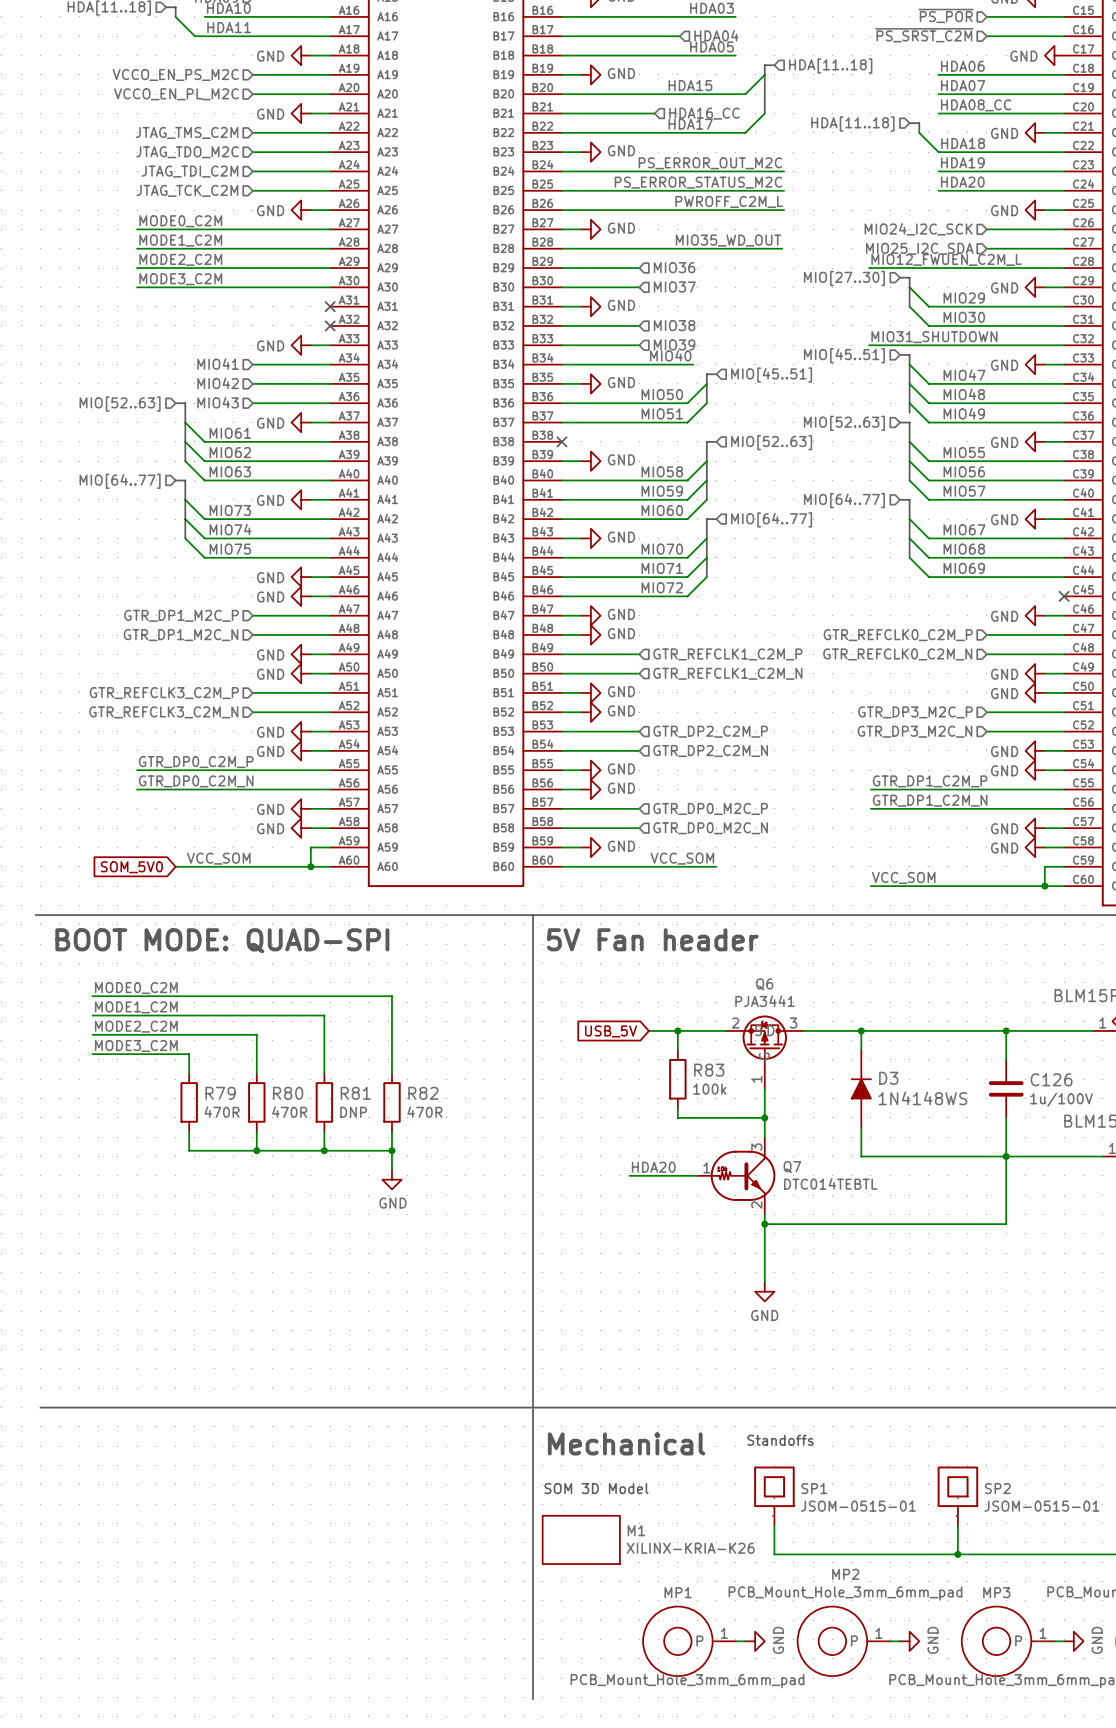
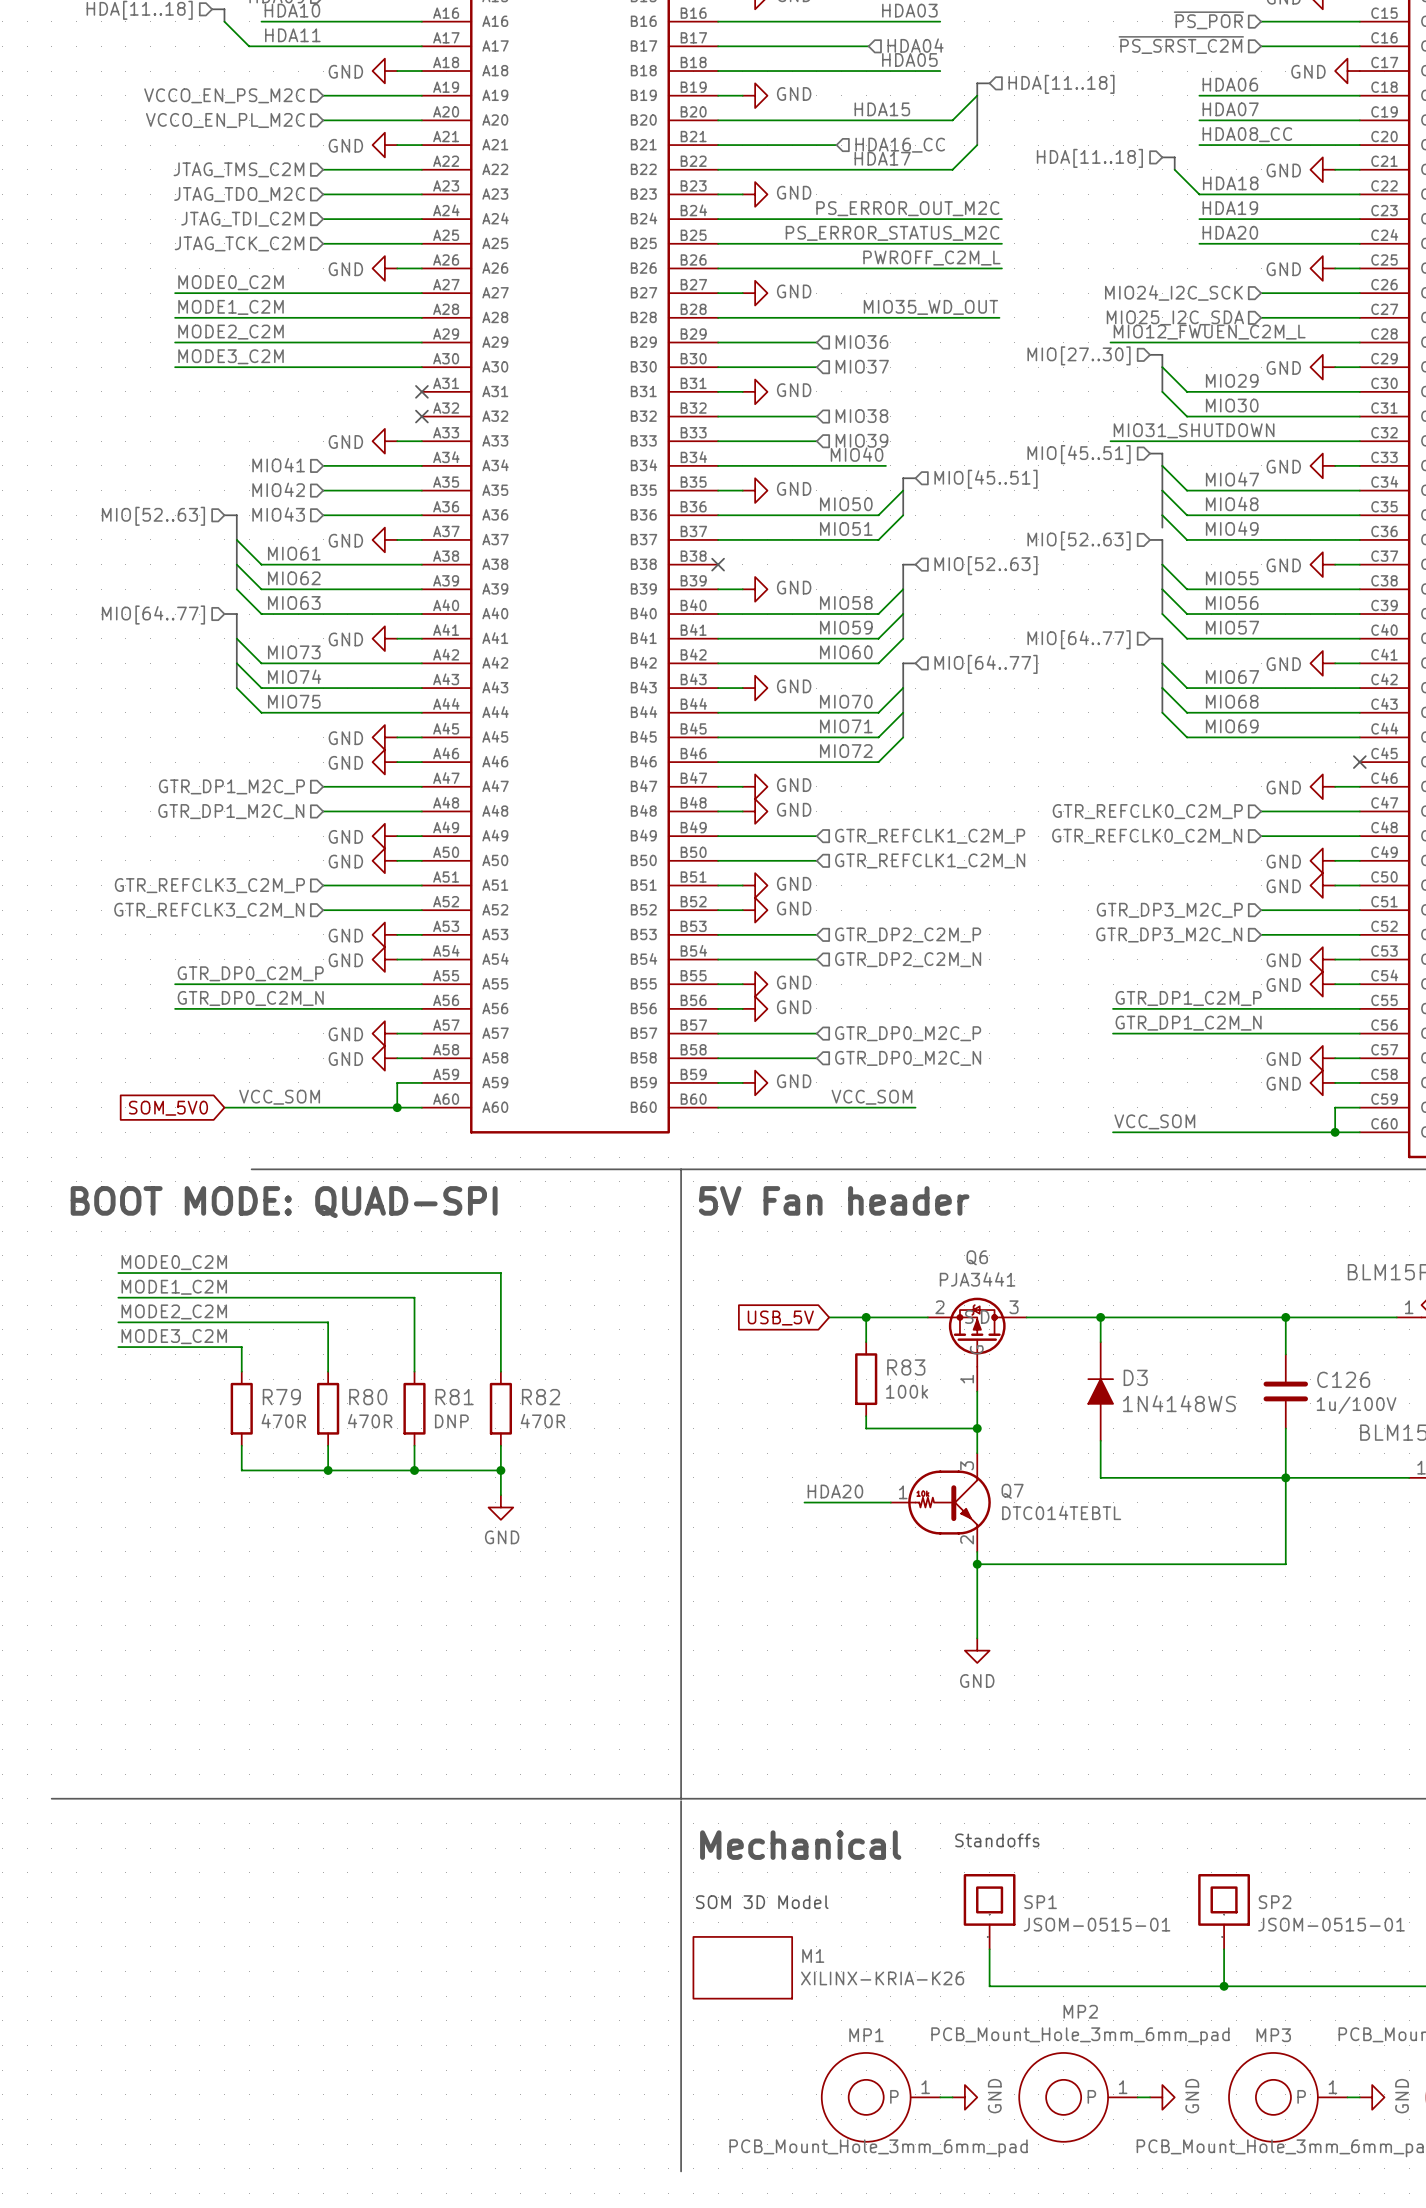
line: (35, 915) (196, 915) -> none

